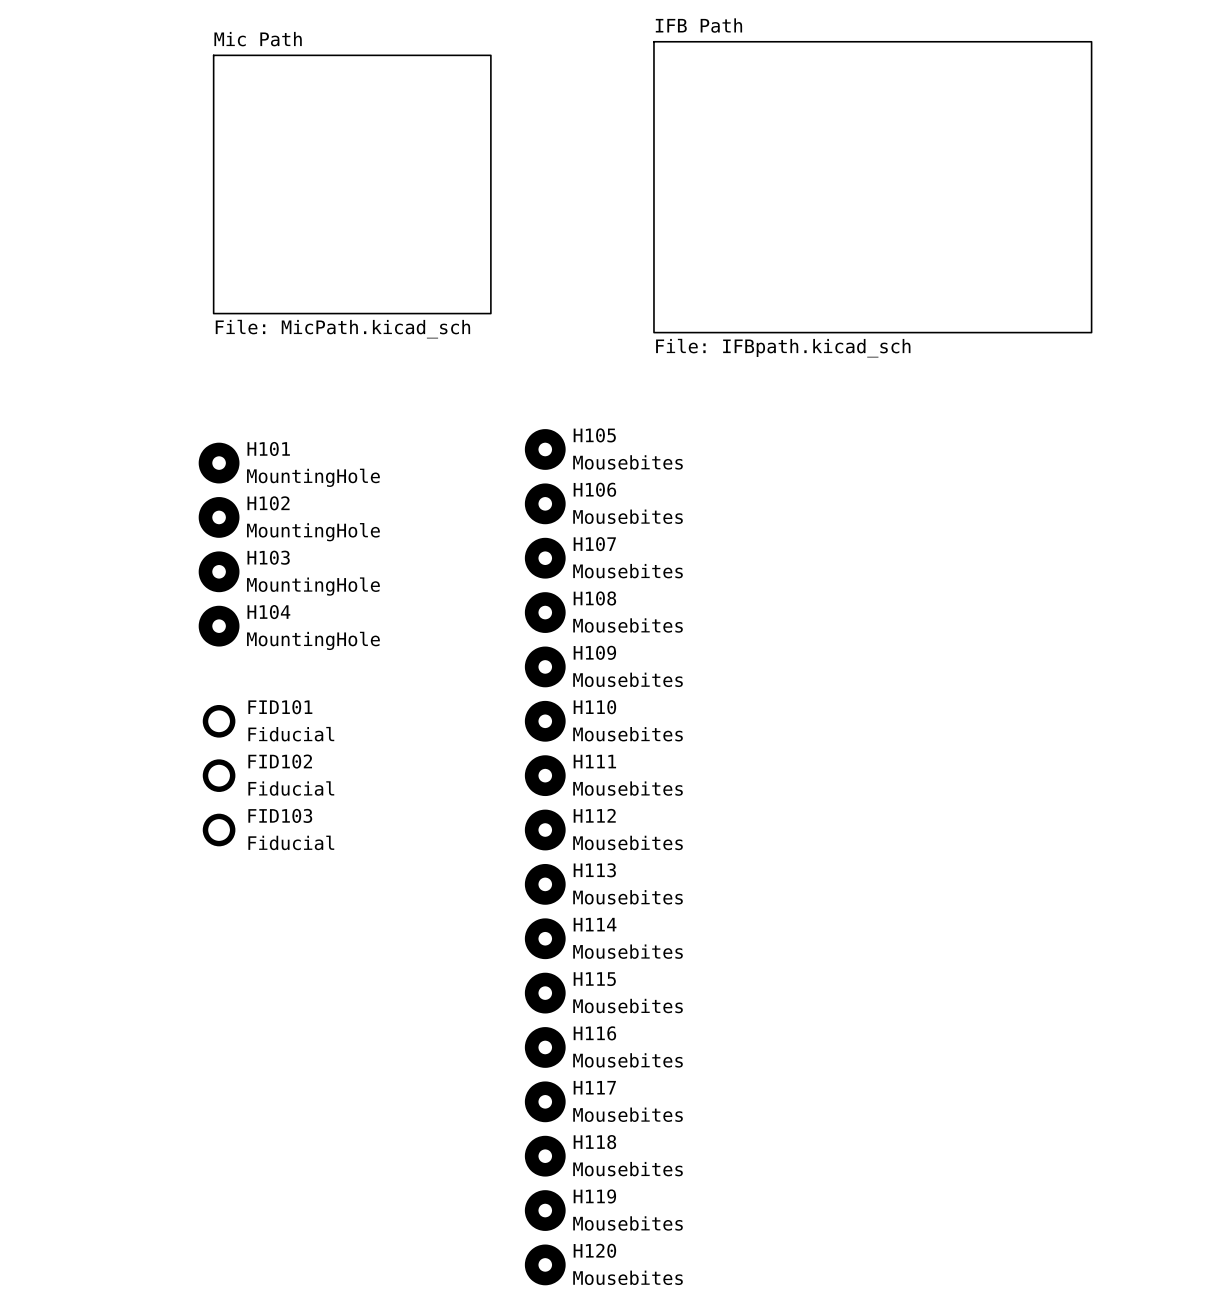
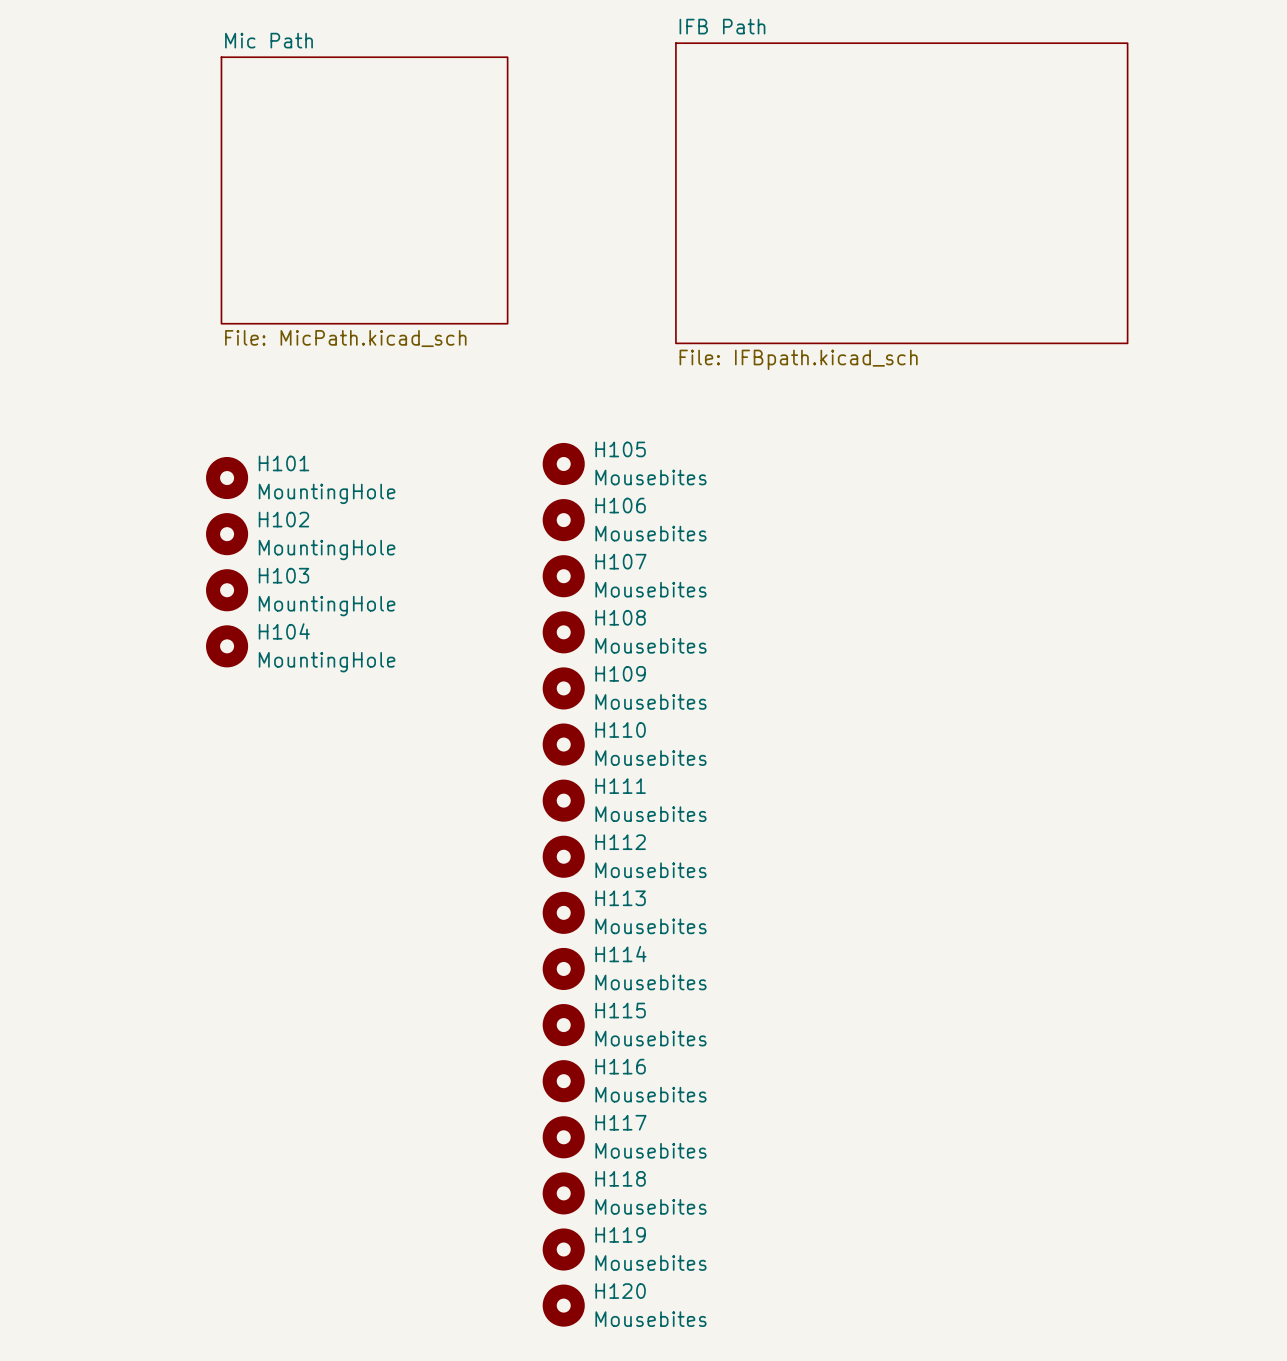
FID101: Fiducial (219, 721) -> none
FID102: Fiducial (219, 775) -> none
FID103: Fiducial (219, 830) -> none

